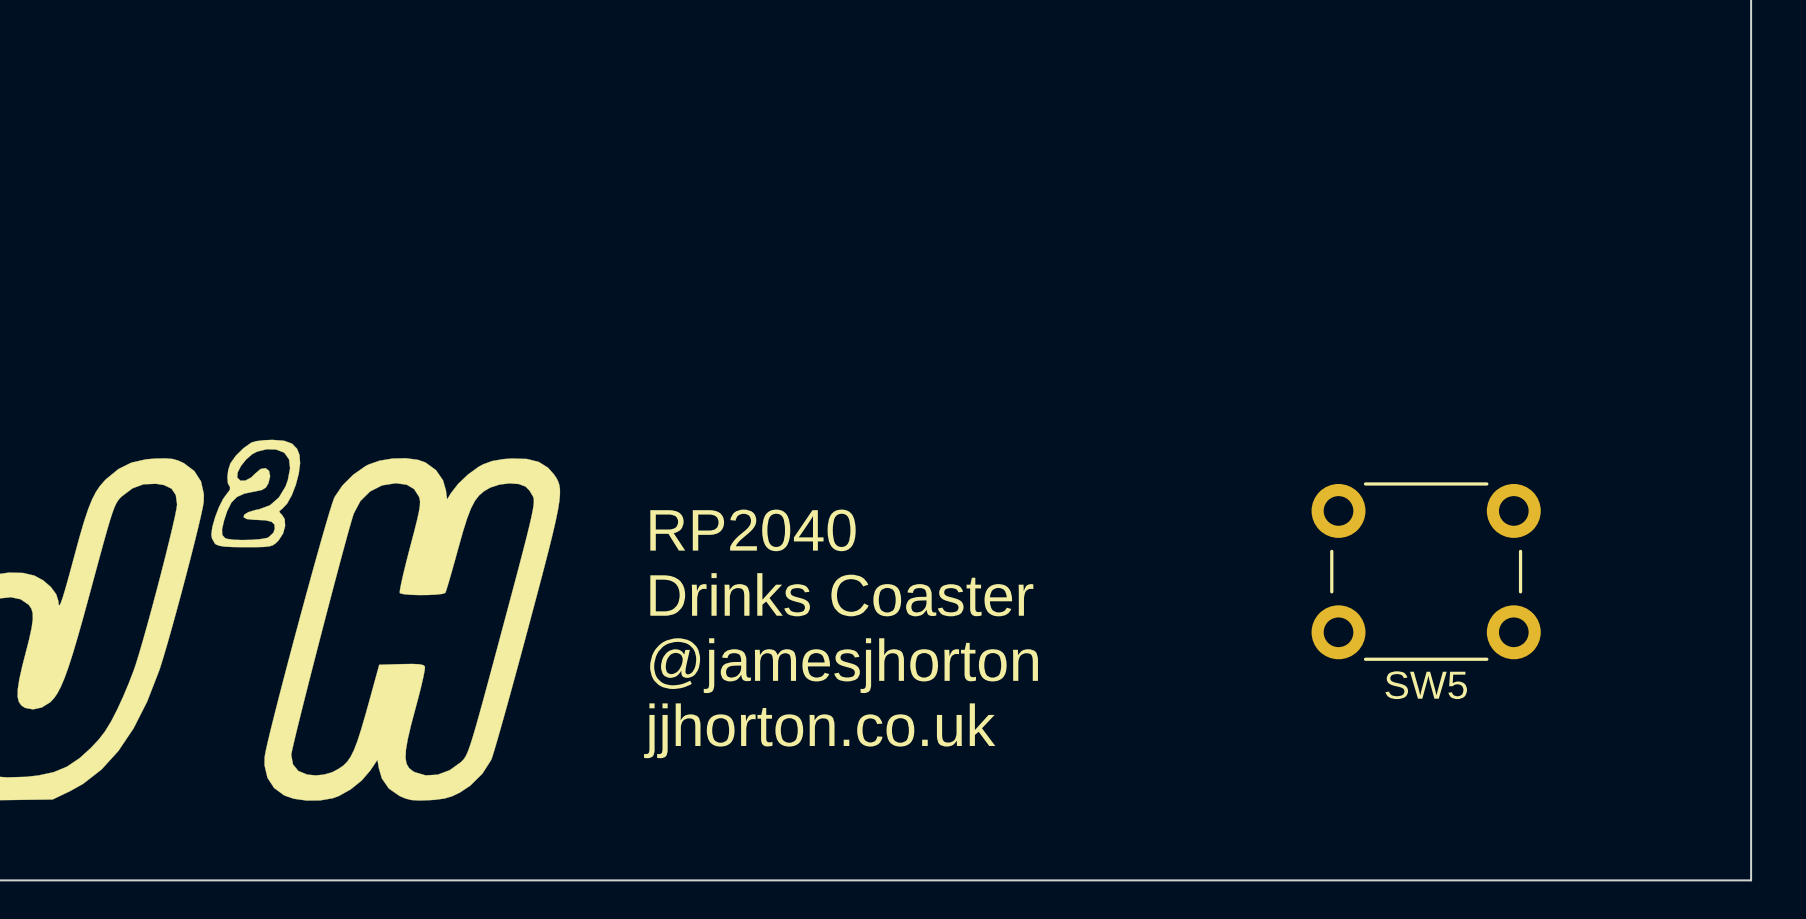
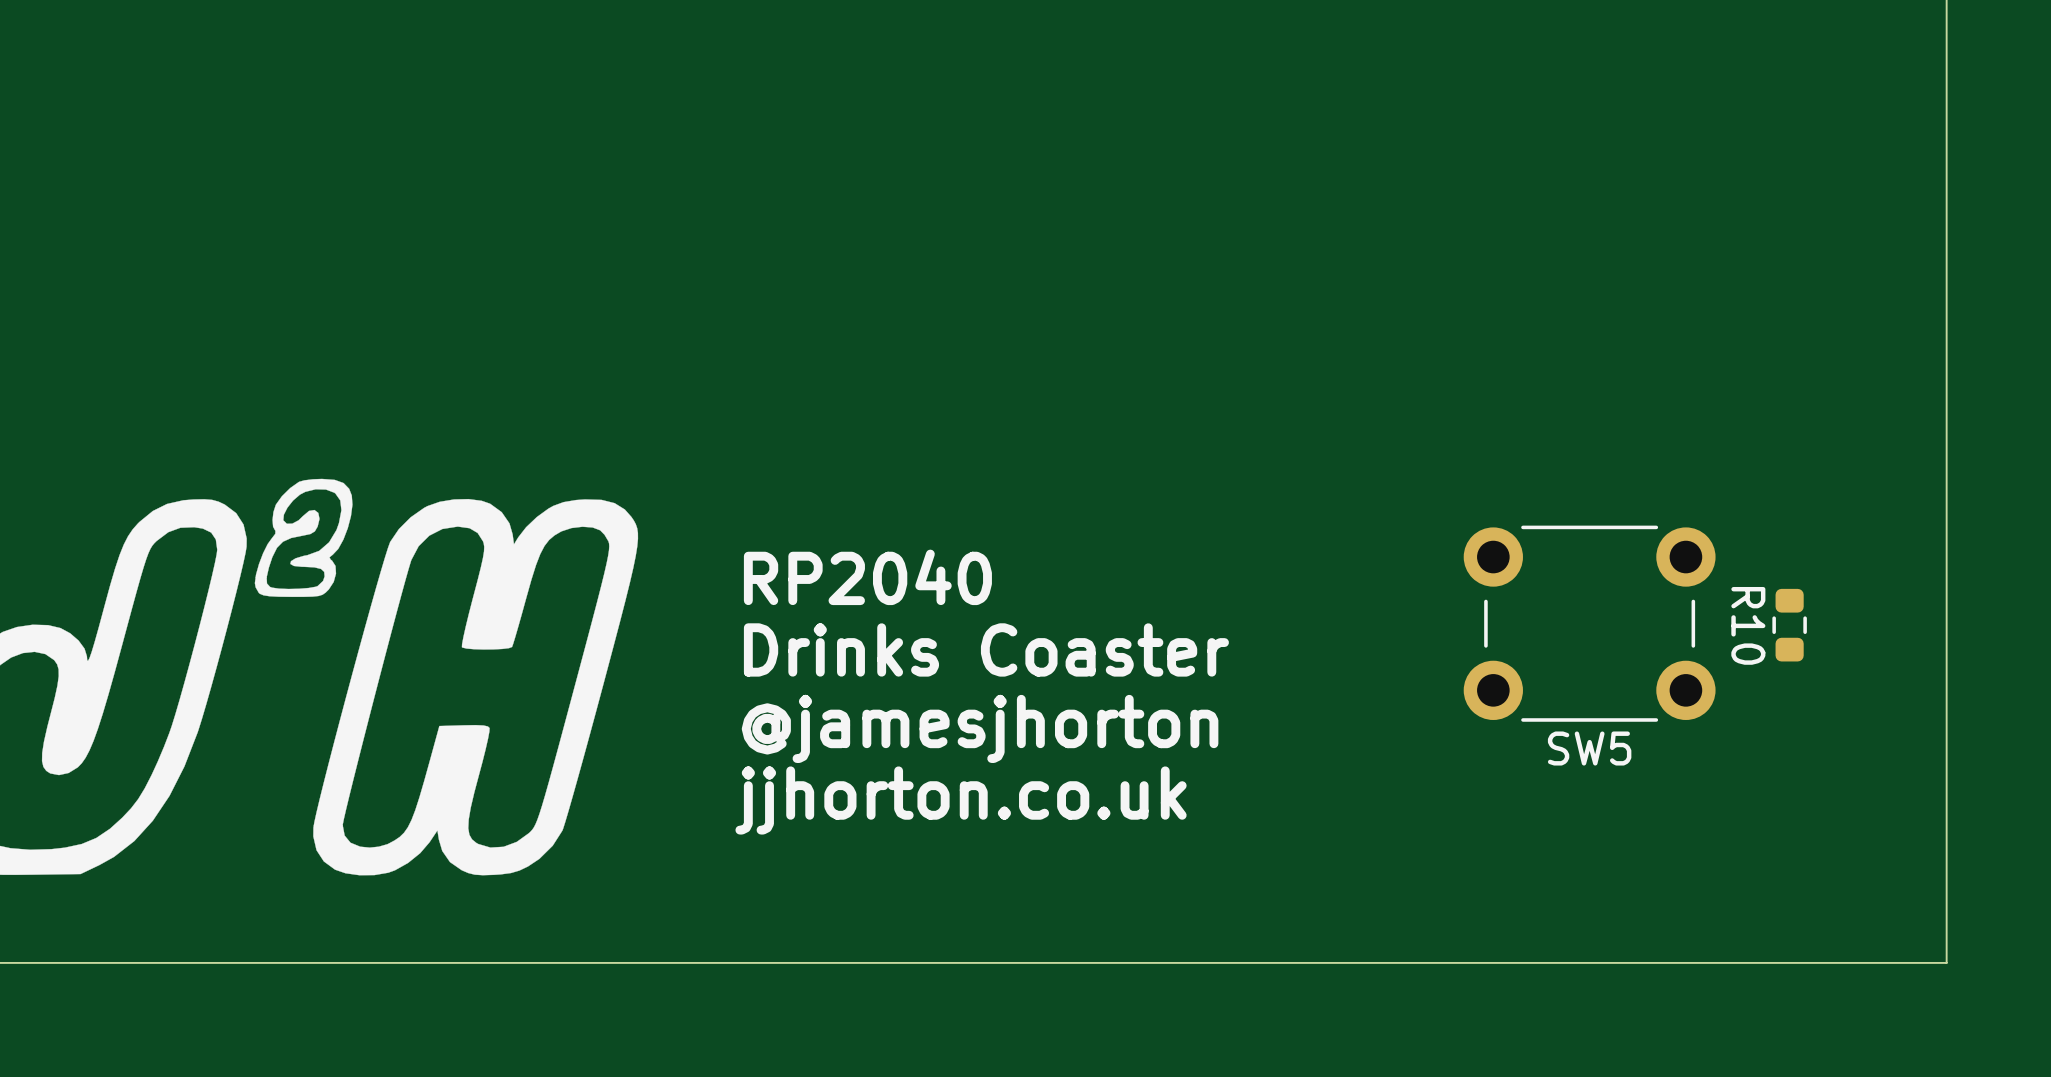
R10: none -> (1789, 625)

